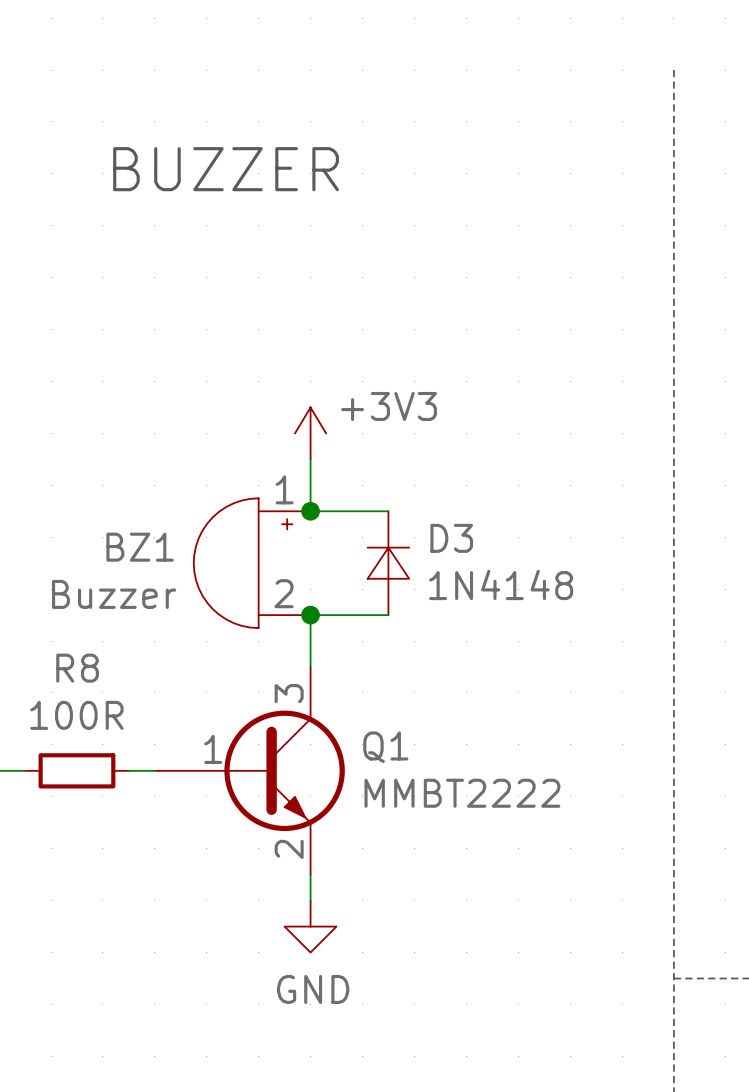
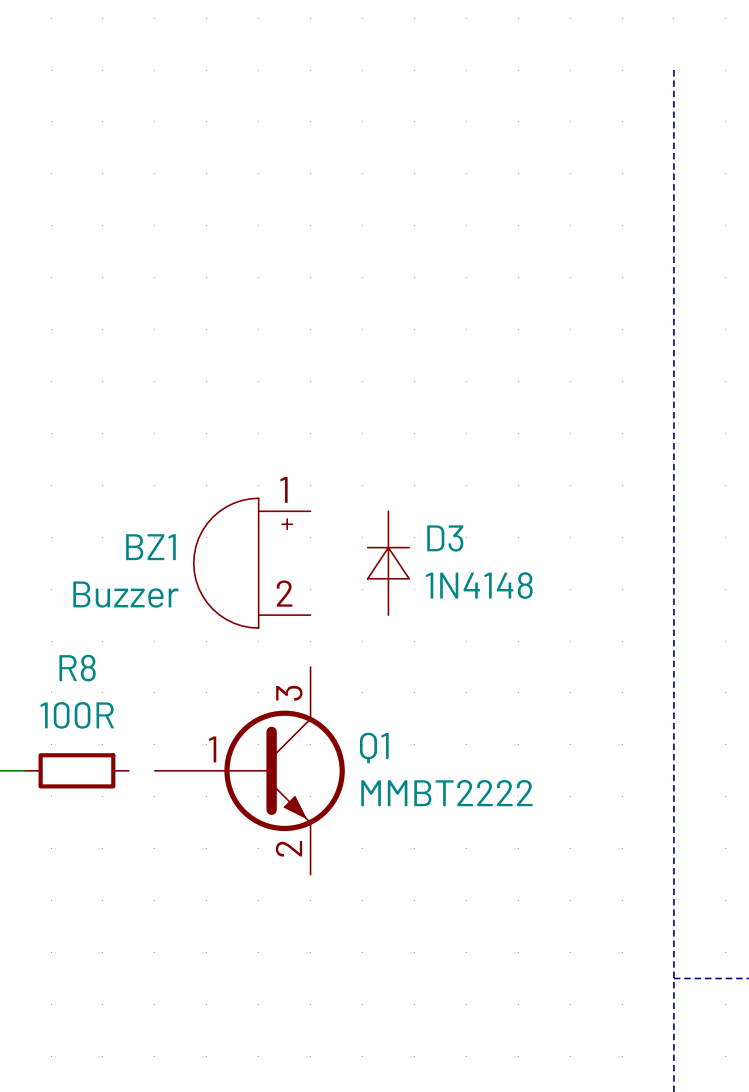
text: BUZZER (226, 169) -> none
power symbol: +3V3 (310, 433) -> none
wire: (310, 459) (310, 511) (388, 511) -> none
junction: (310, 511) -> none
junction: (310, 615) -> none
wire: (388, 615) (310, 615) (310, 667) -> none
wire: (128, 770) (154, 770) -> none
wire: (310, 874) (310, 900) -> none
power symbol: GND (310, 926) -> none

